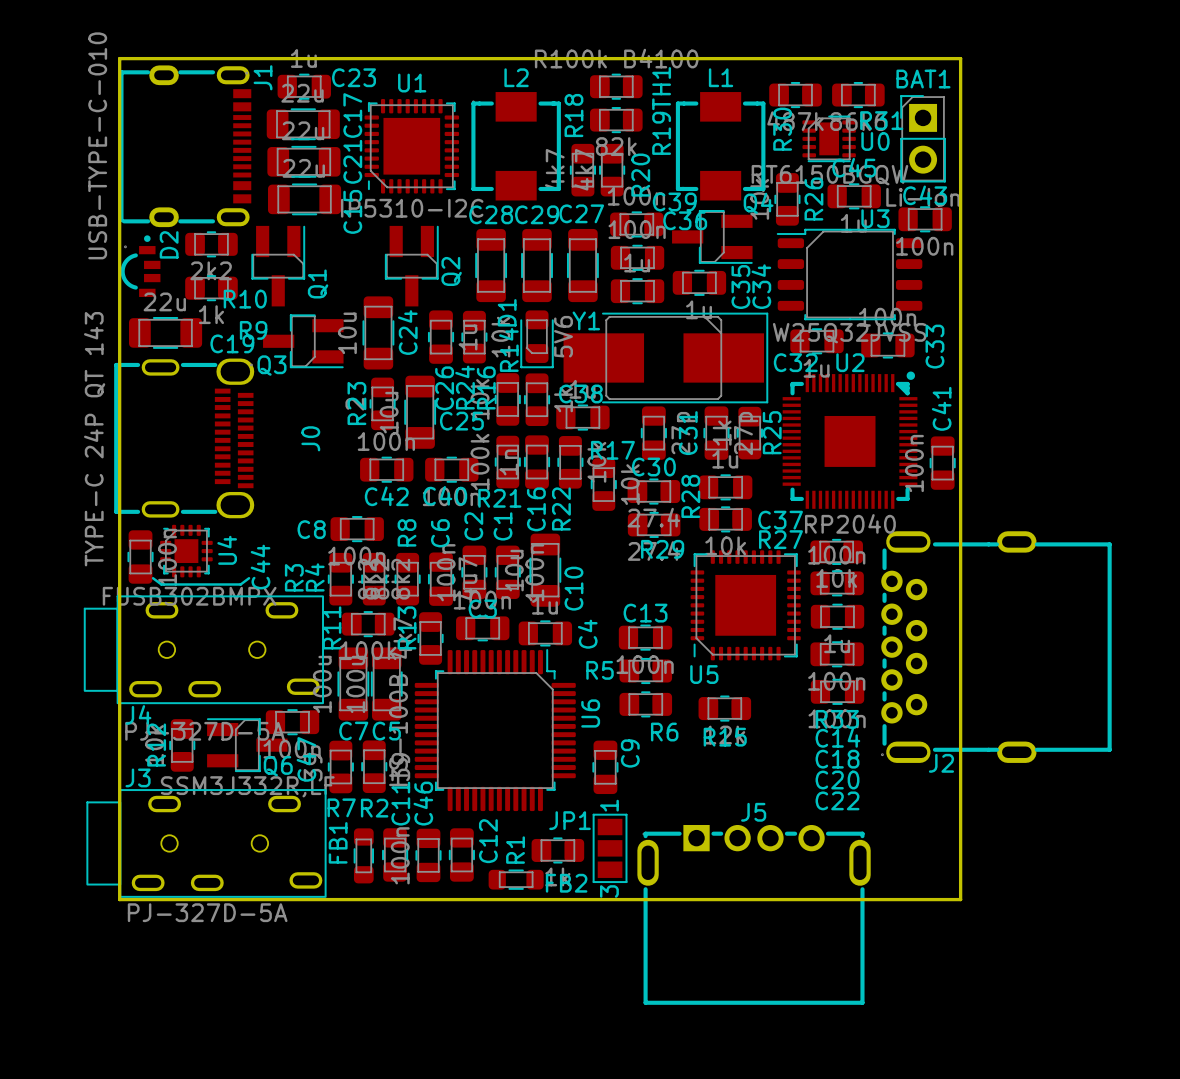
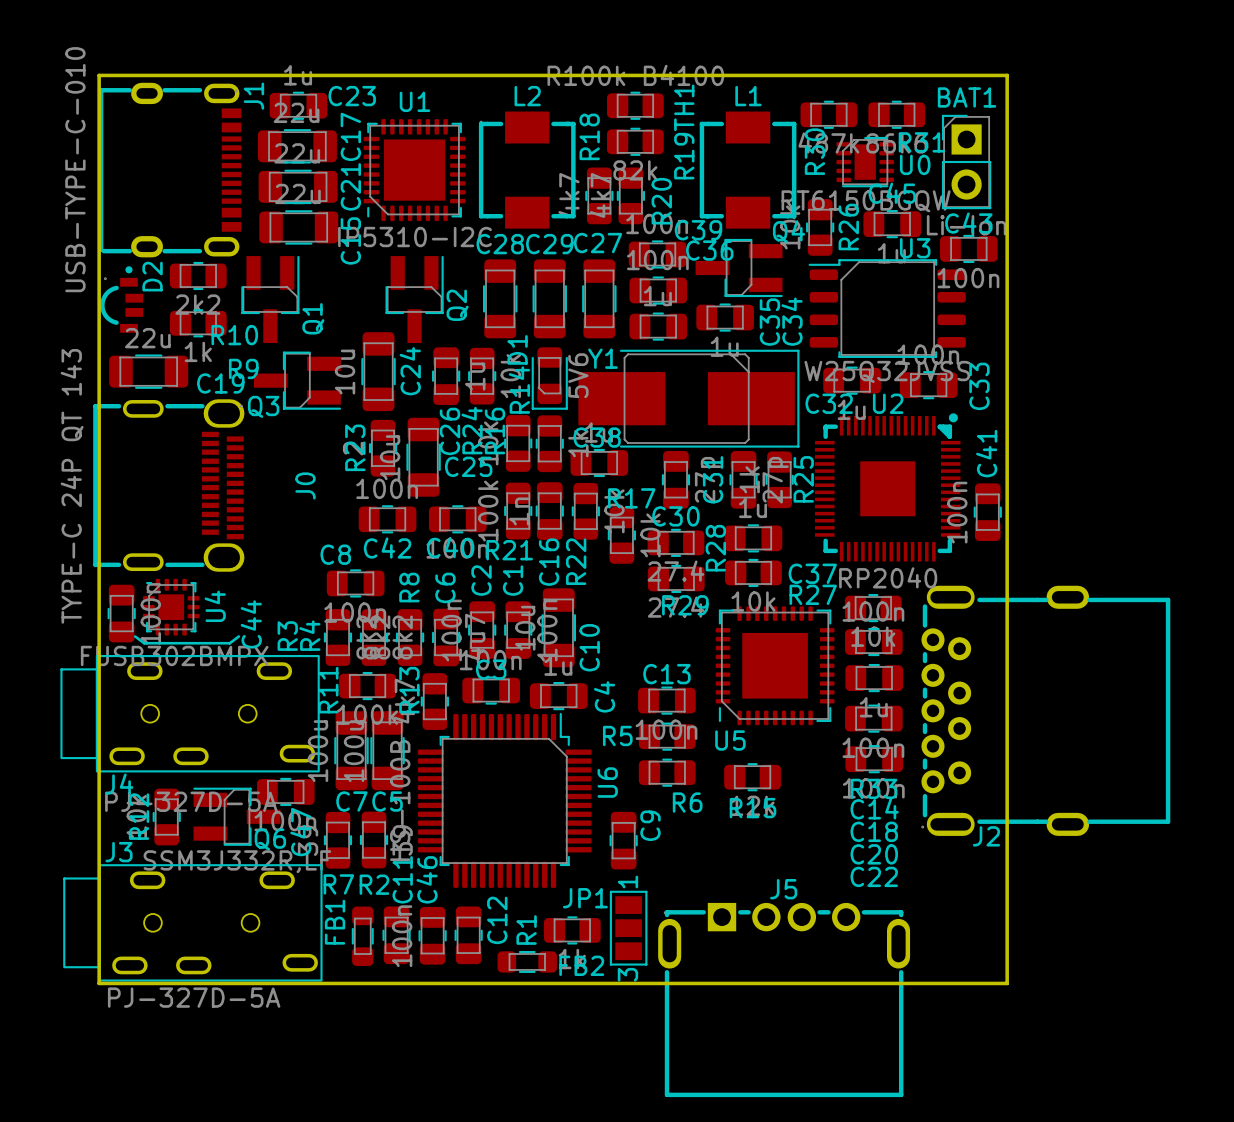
C8 name position: C8 (311, 529) -> C8 (335, 554)

